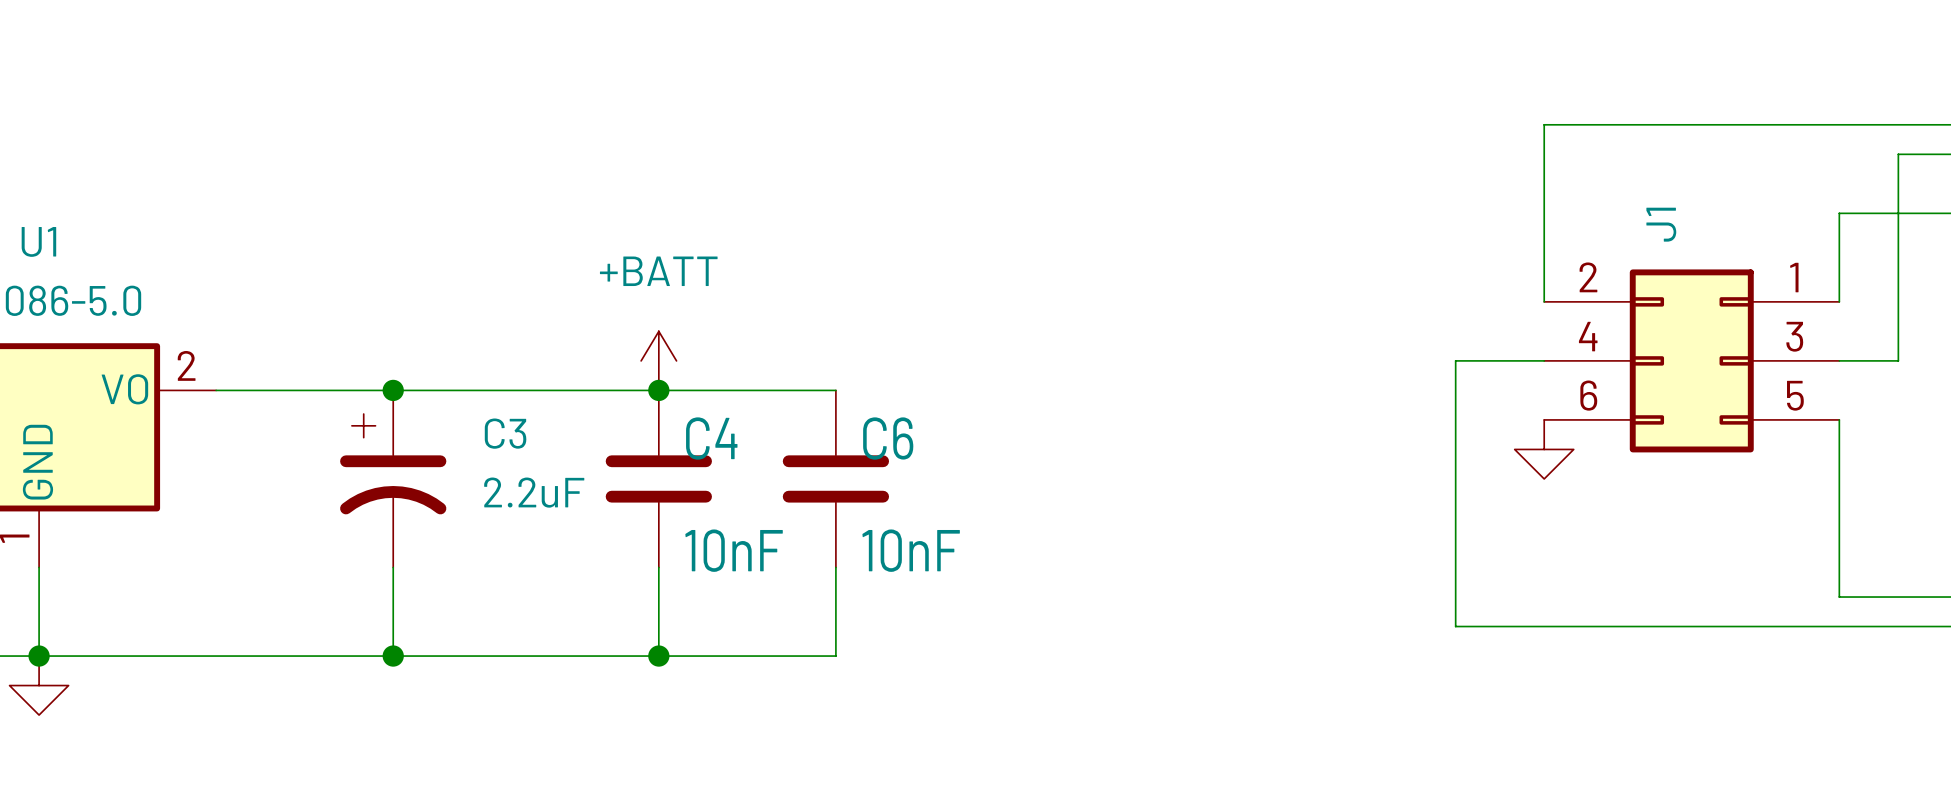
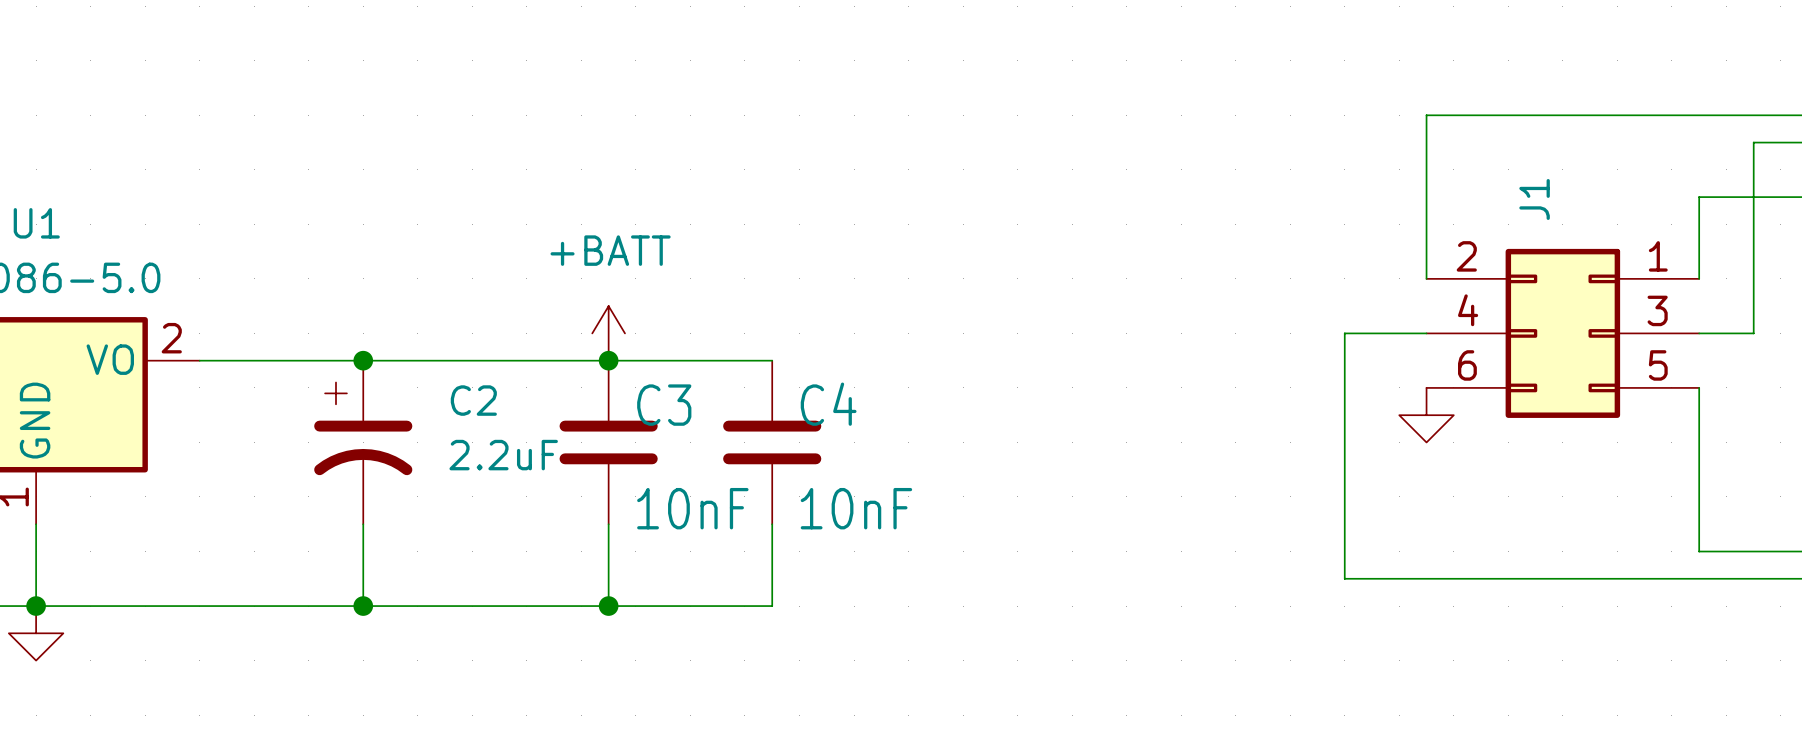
C3 name: C3 (505, 433) -> C2 (473, 400)
C4 name: C4 (711, 438) -> C3 (664, 405)
C6 name: C6 (888, 438) -> C4 (828, 404)

